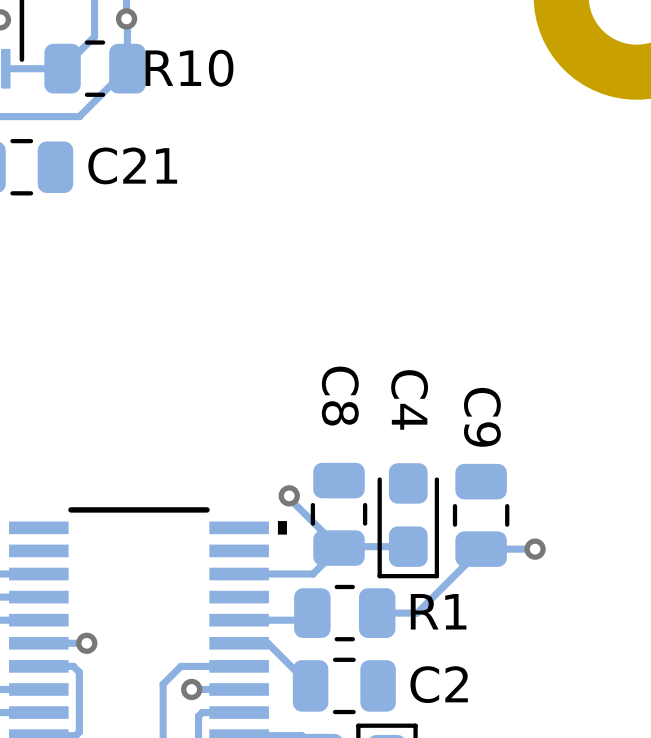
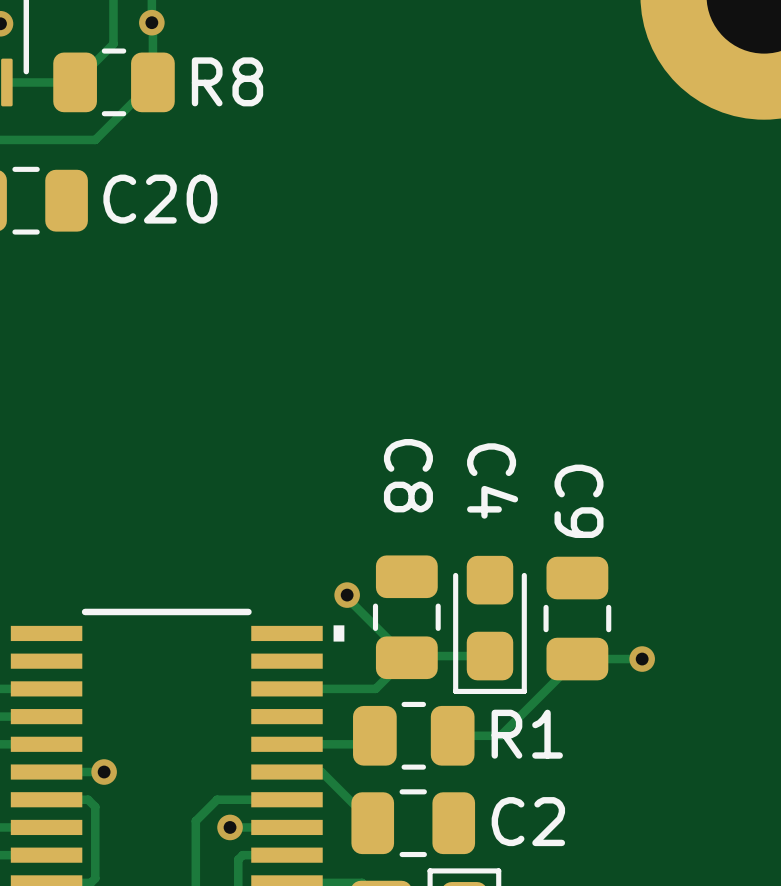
R10 name: R10 (189, 68) -> R8 (227, 81)
C21 name: C21 (132, 165) -> C20 (160, 199)

